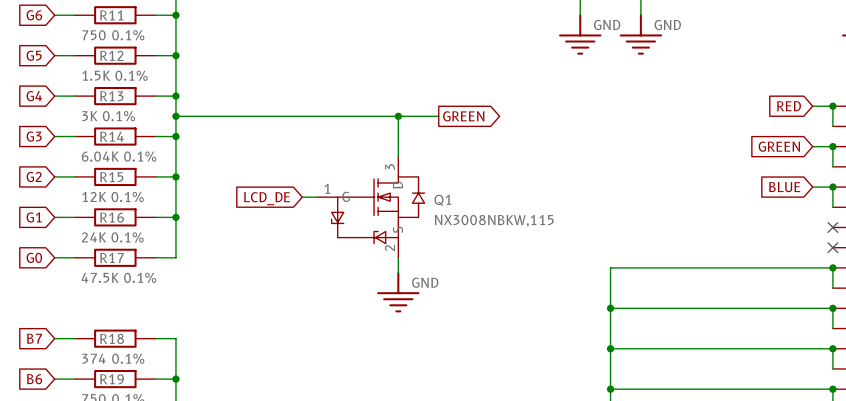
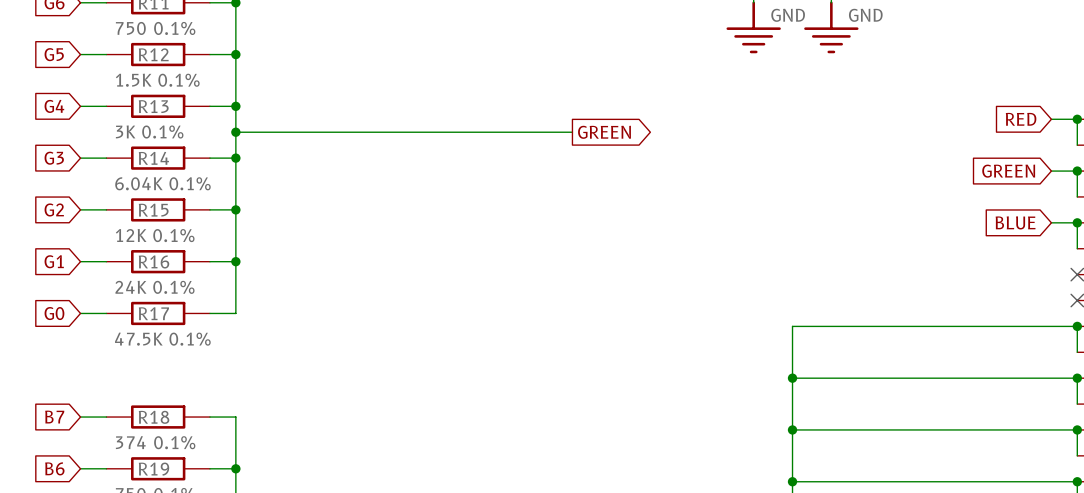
wire: (398, 116) (398, 156) -> none
junction: (398, 116) -> none
wire: (302, 197) (317, 197) -> none
global label: LCD_DE (267, 198) -> none
Q1: NX3008NBKW,115 (371, 207) -> none
wire: (398, 257) (398, 272) -> none
power symbol: GND (398, 292) -> none

